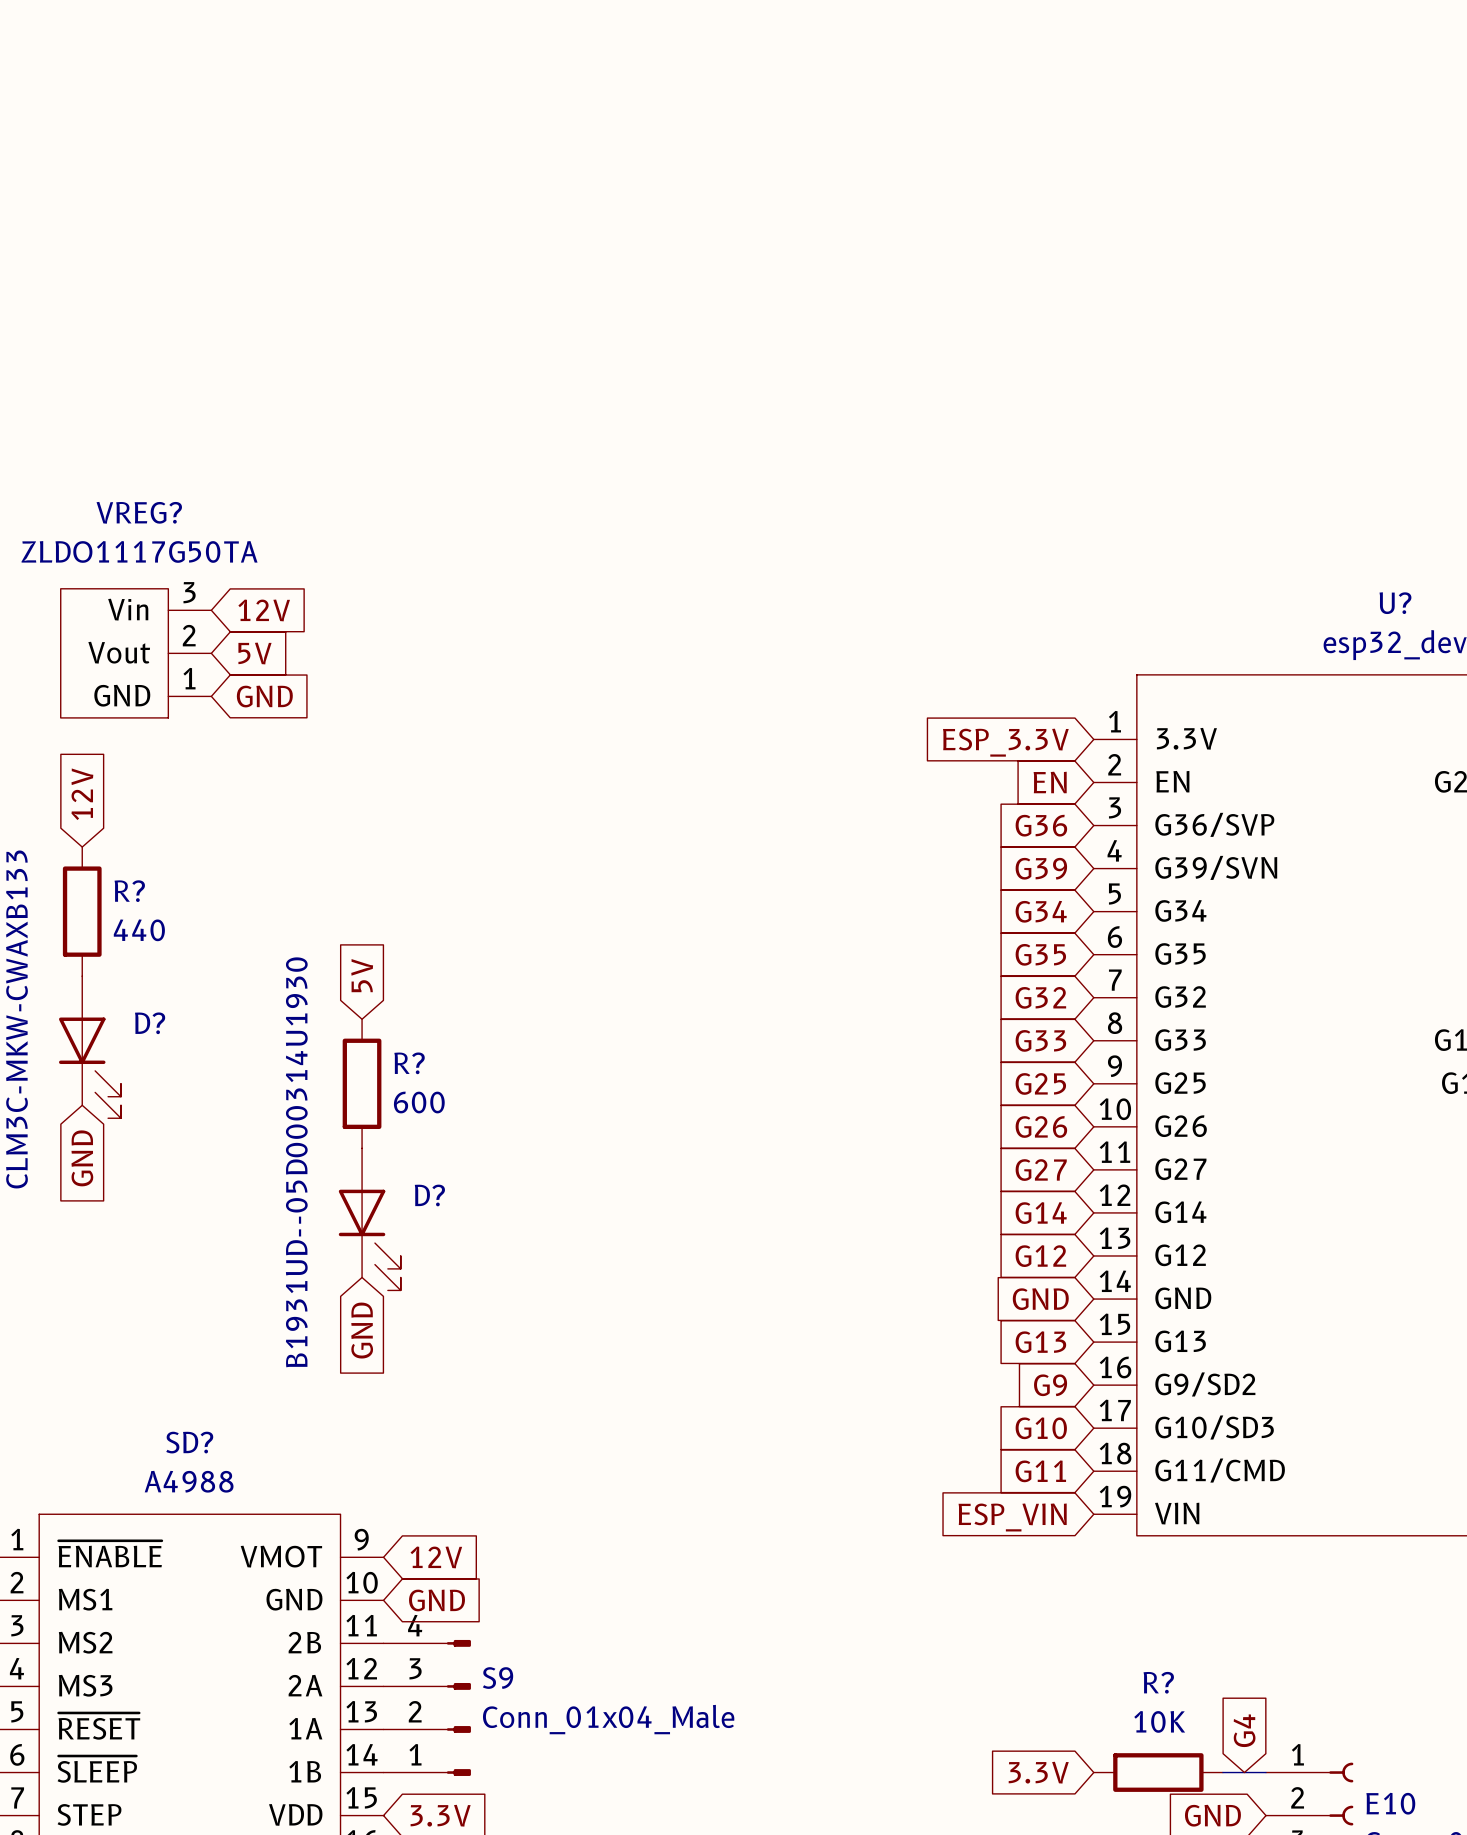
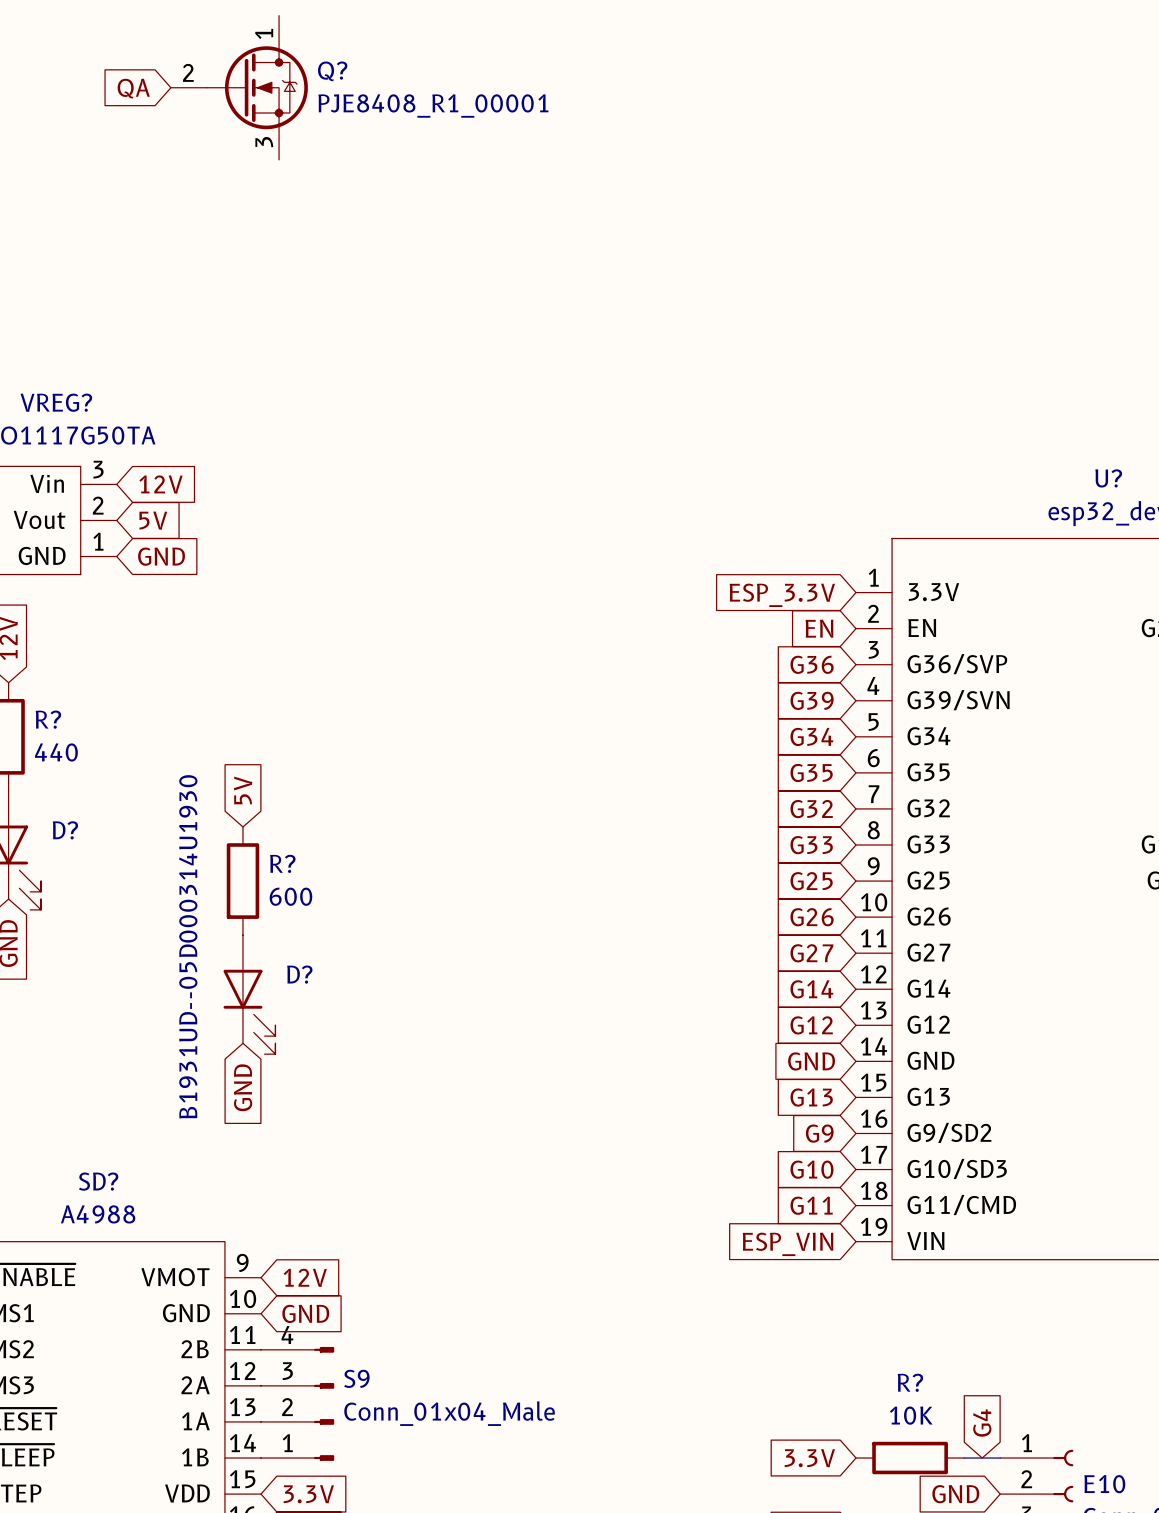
Q?: none -> PJE8408_R1_00001 (239, 87)
global label: none -> QA (133, 88)

